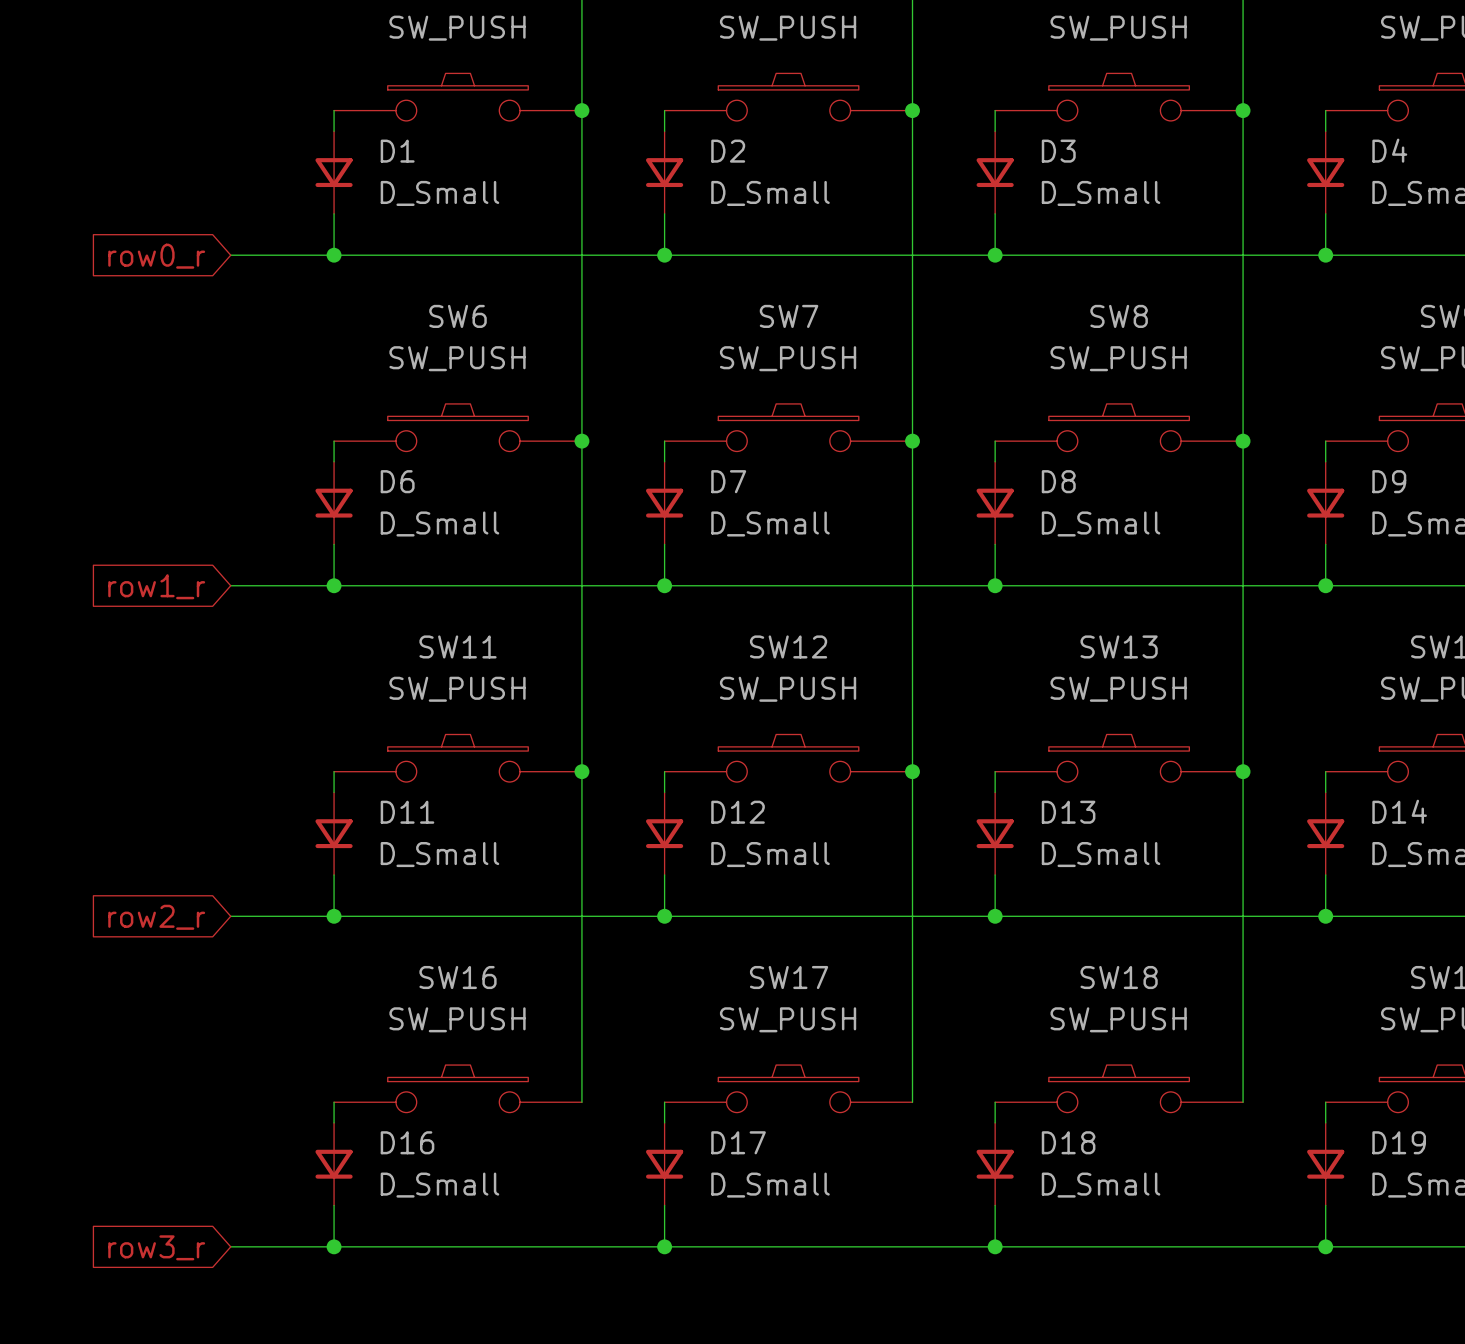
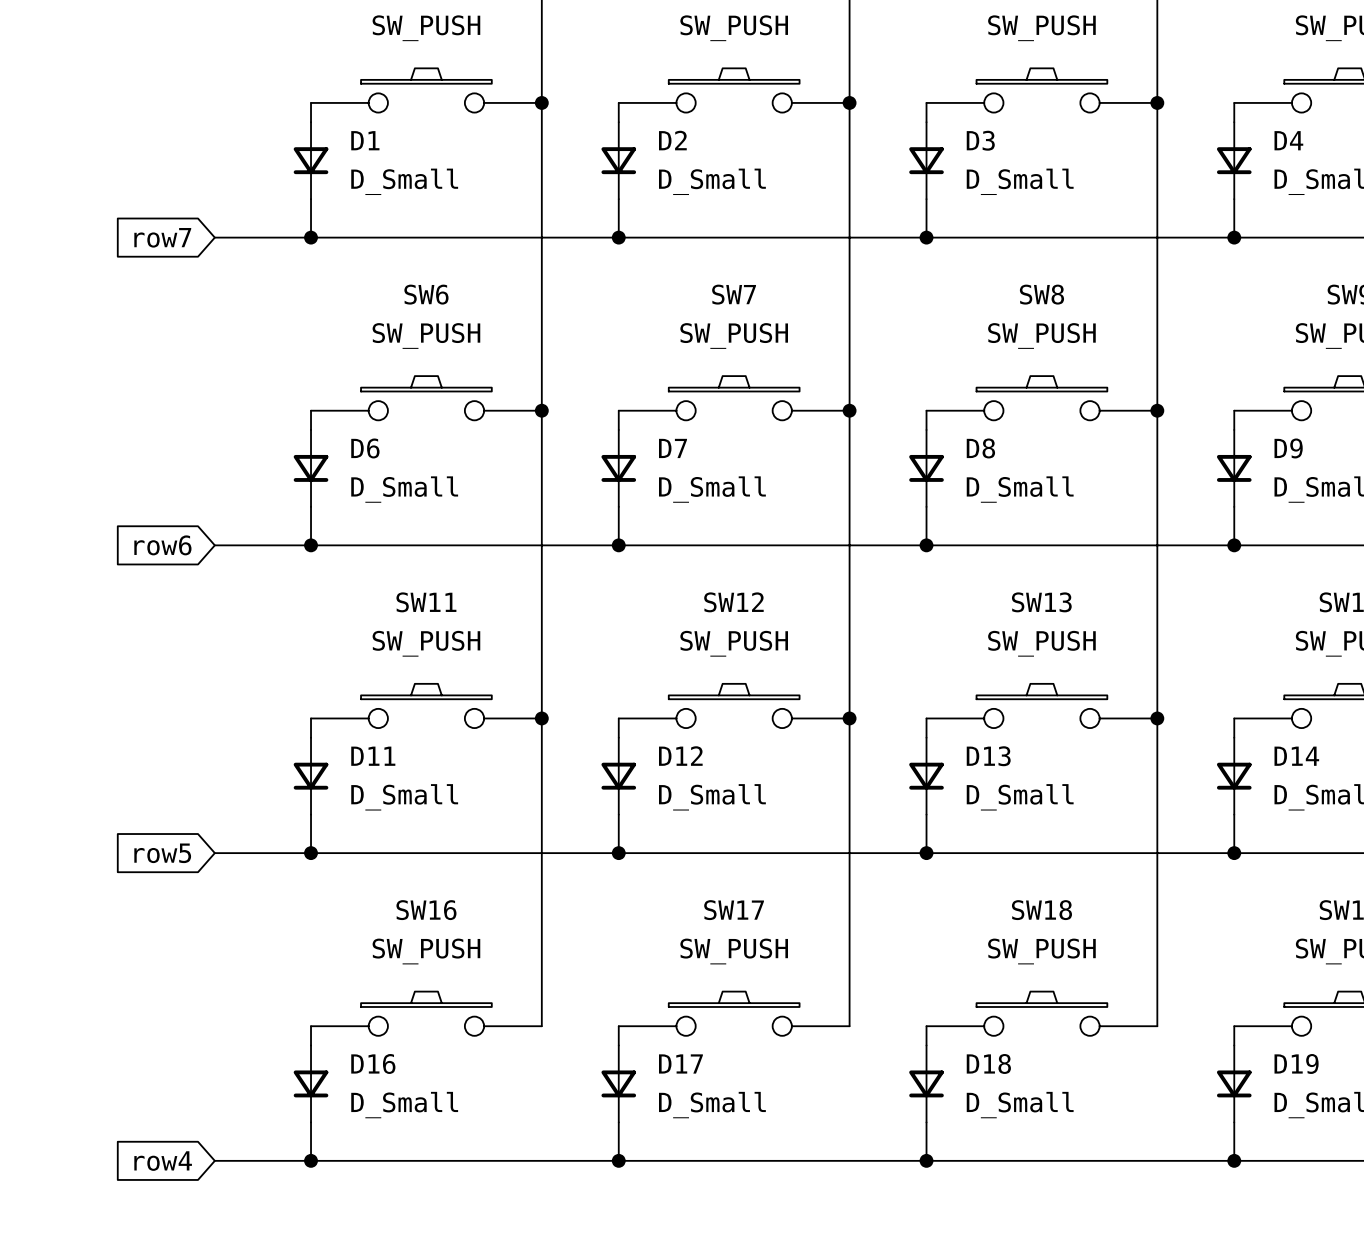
global label: row0_r (156, 256) -> row7 (162, 237)
global label: row1_r (156, 586) -> row6 (162, 545)
global label: row2_r (156, 917) -> row5 (162, 853)
global label: row3_r (156, 1247) -> row4 (163, 1161)

